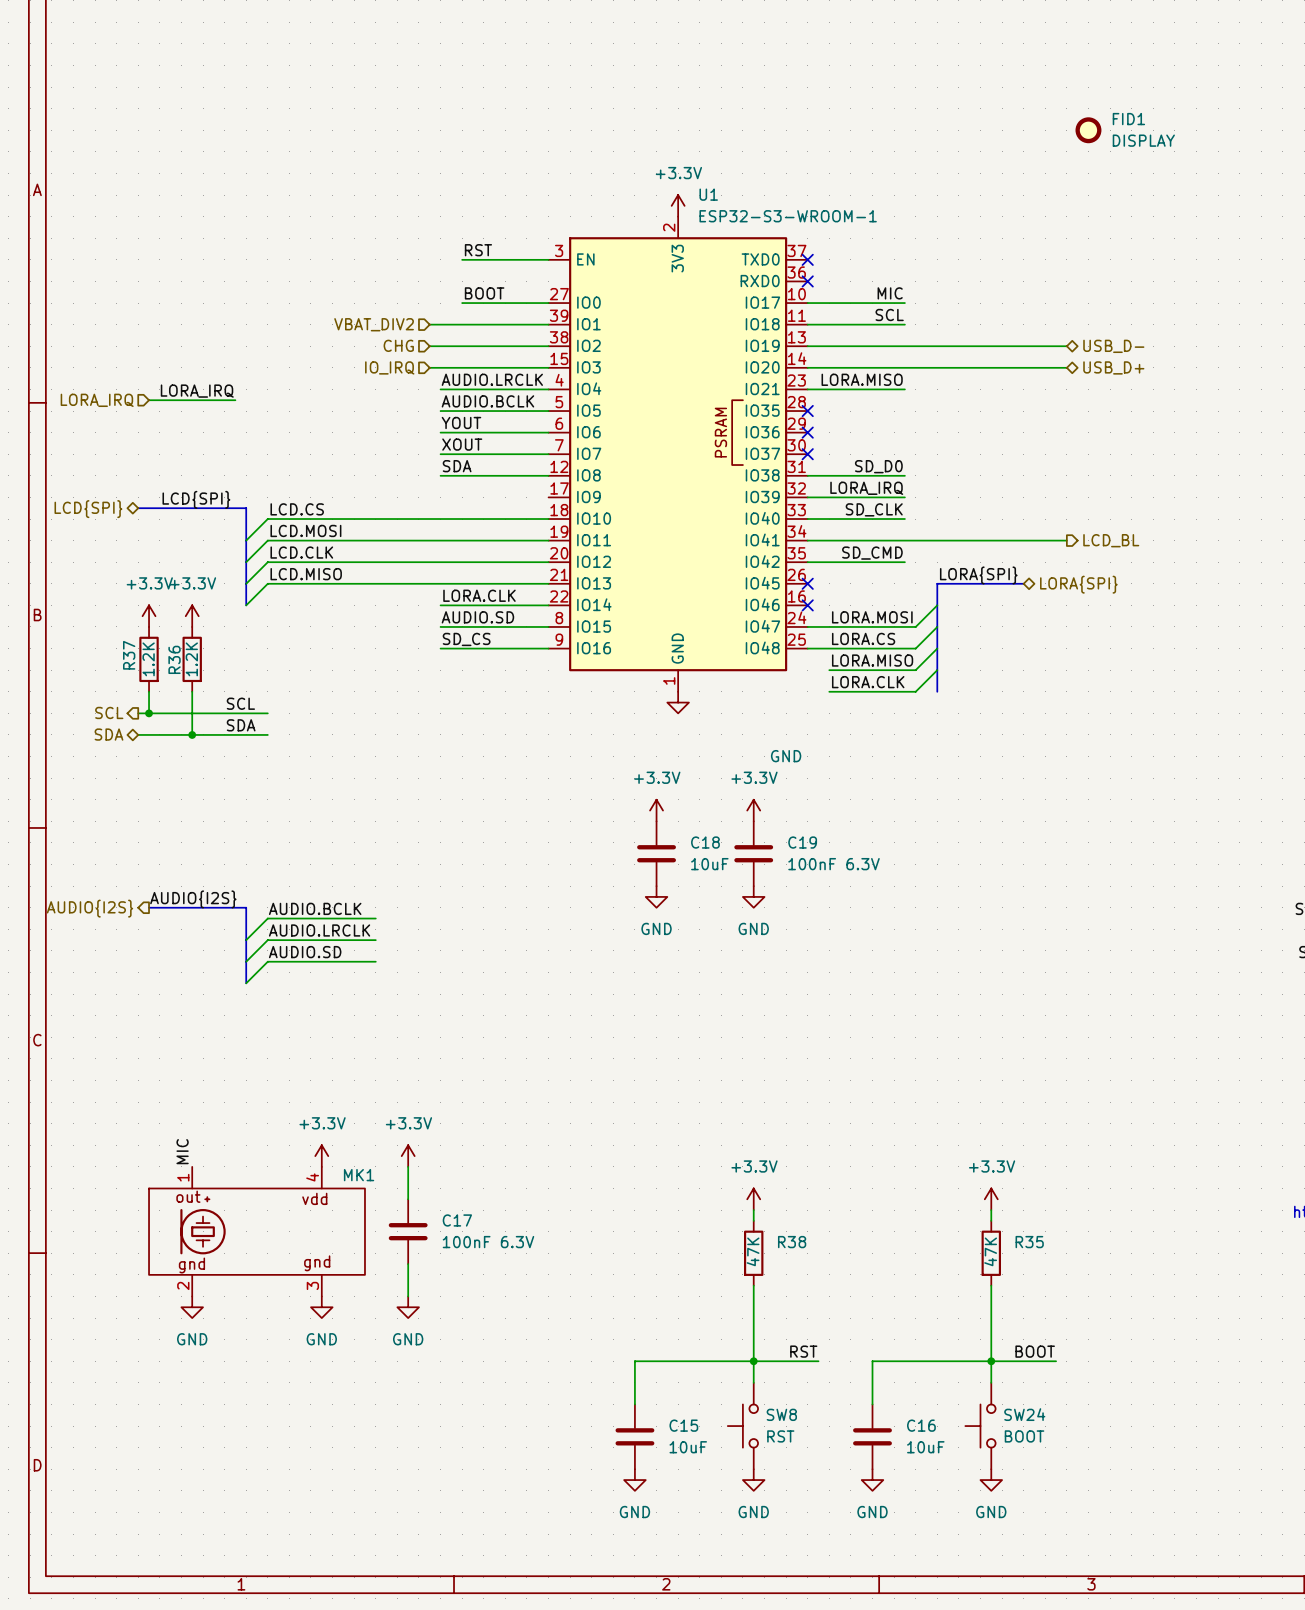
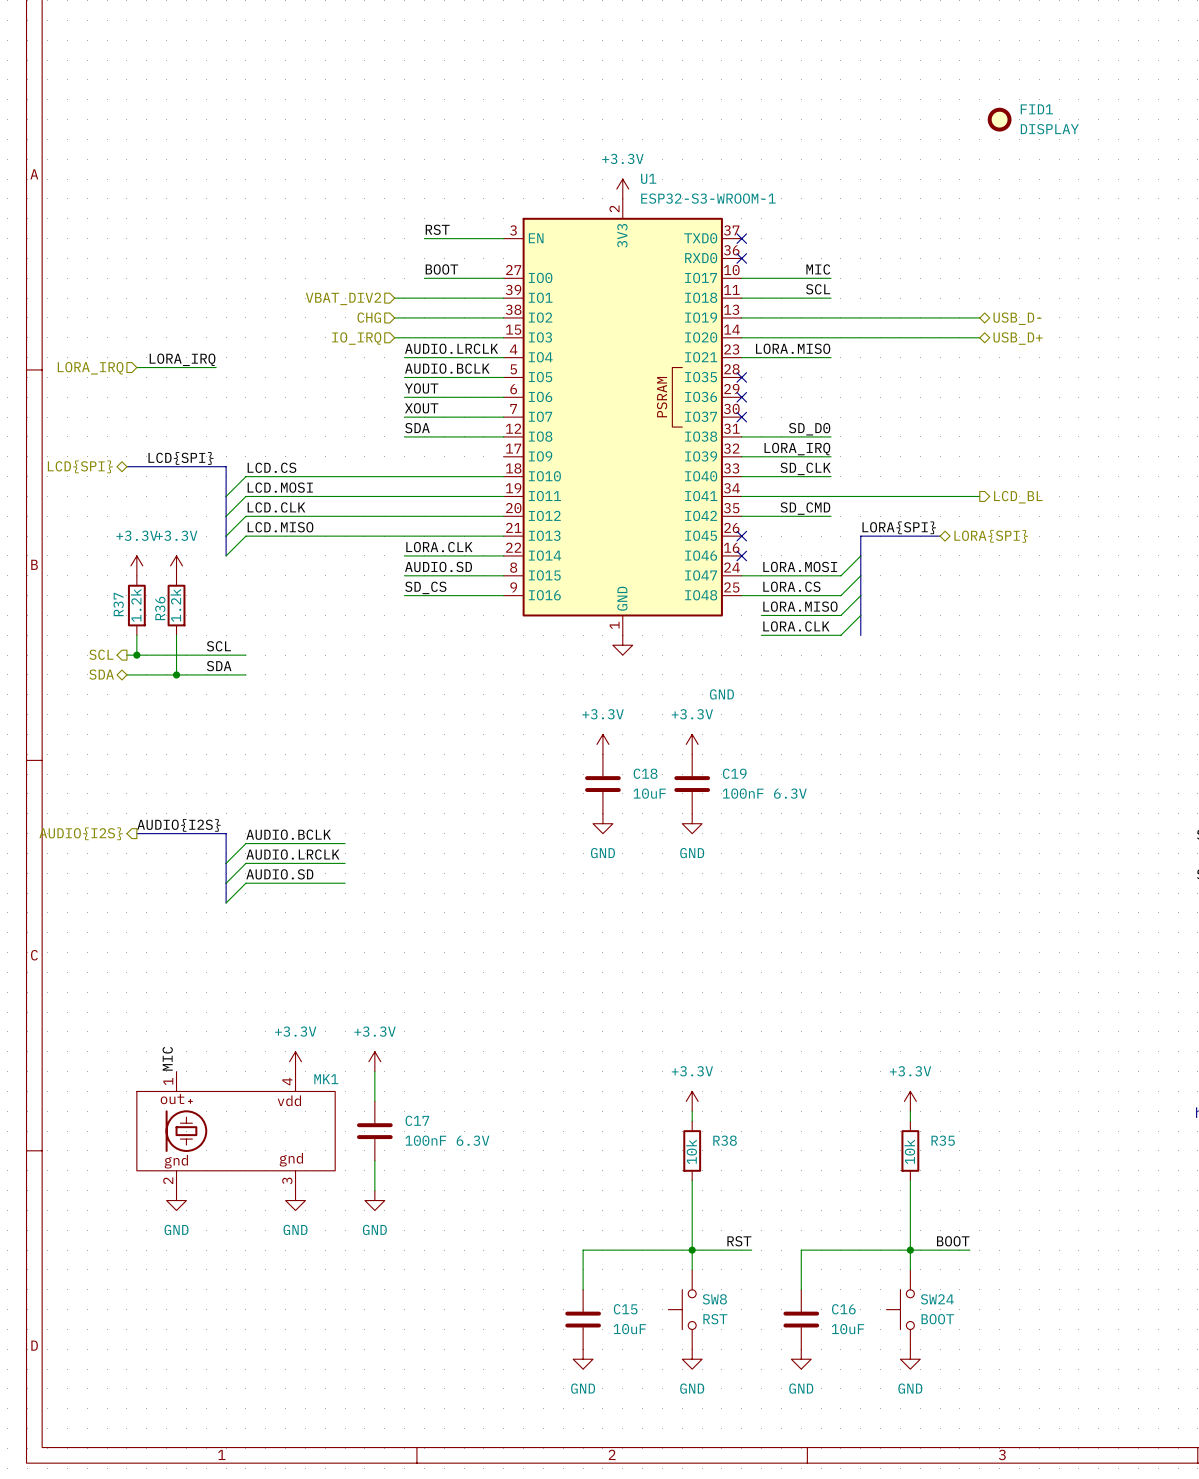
R37 value: 1.2K (148, 659) -> 1.2k (136, 605)
R36 value: 1.2K (191, 659) -> 1.2k (175, 605)
R38 value: 47K (753, 1251) -> 10k (691, 1151)
R35 value: 47K (990, 1251) -> 10k (909, 1151)

